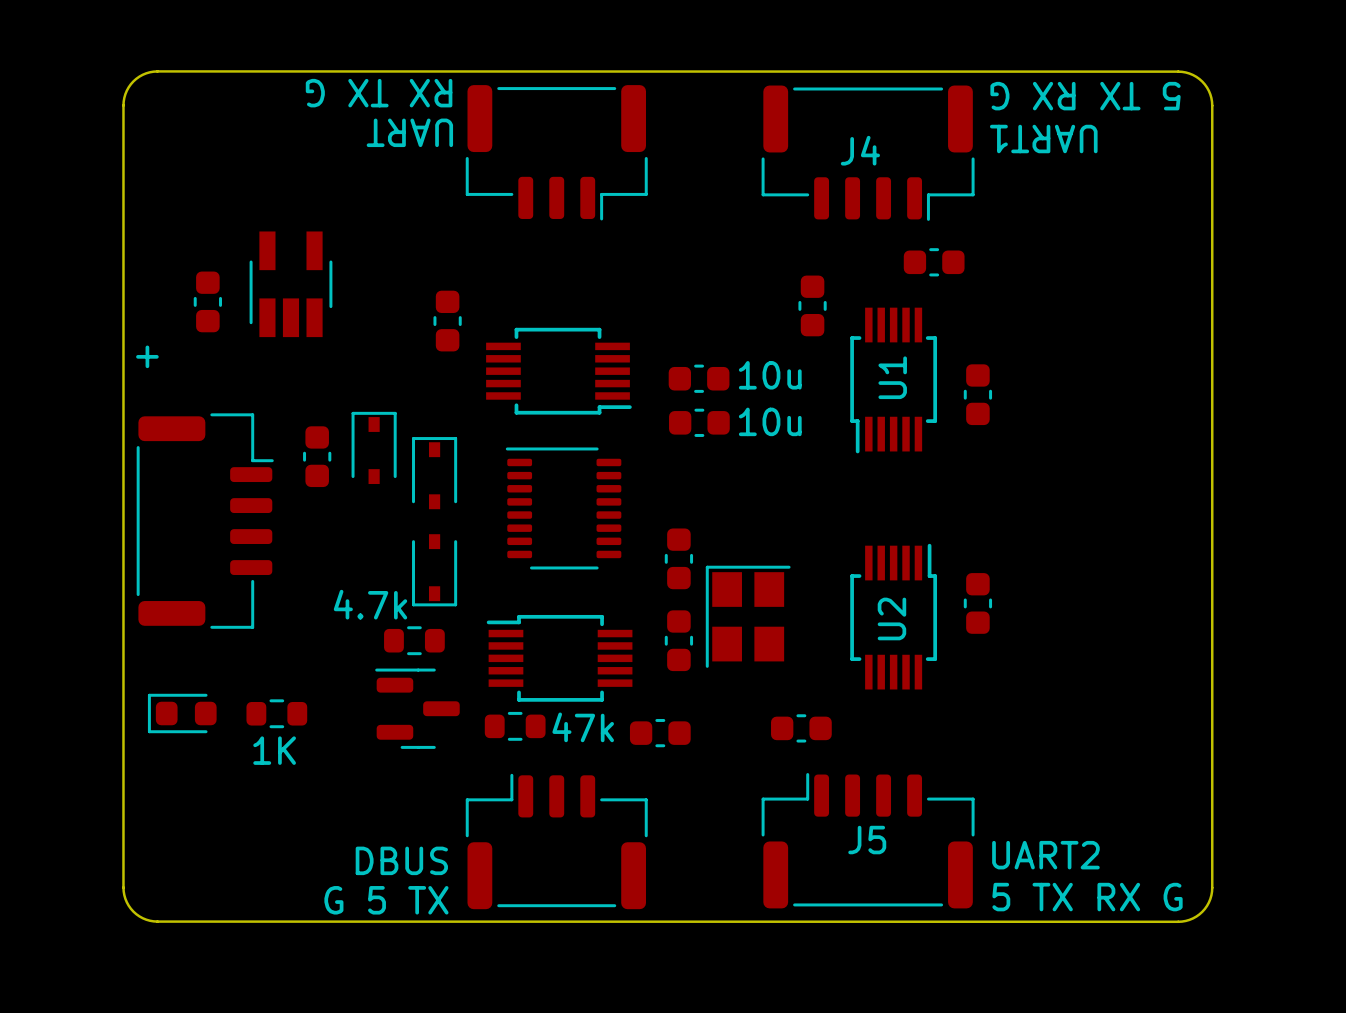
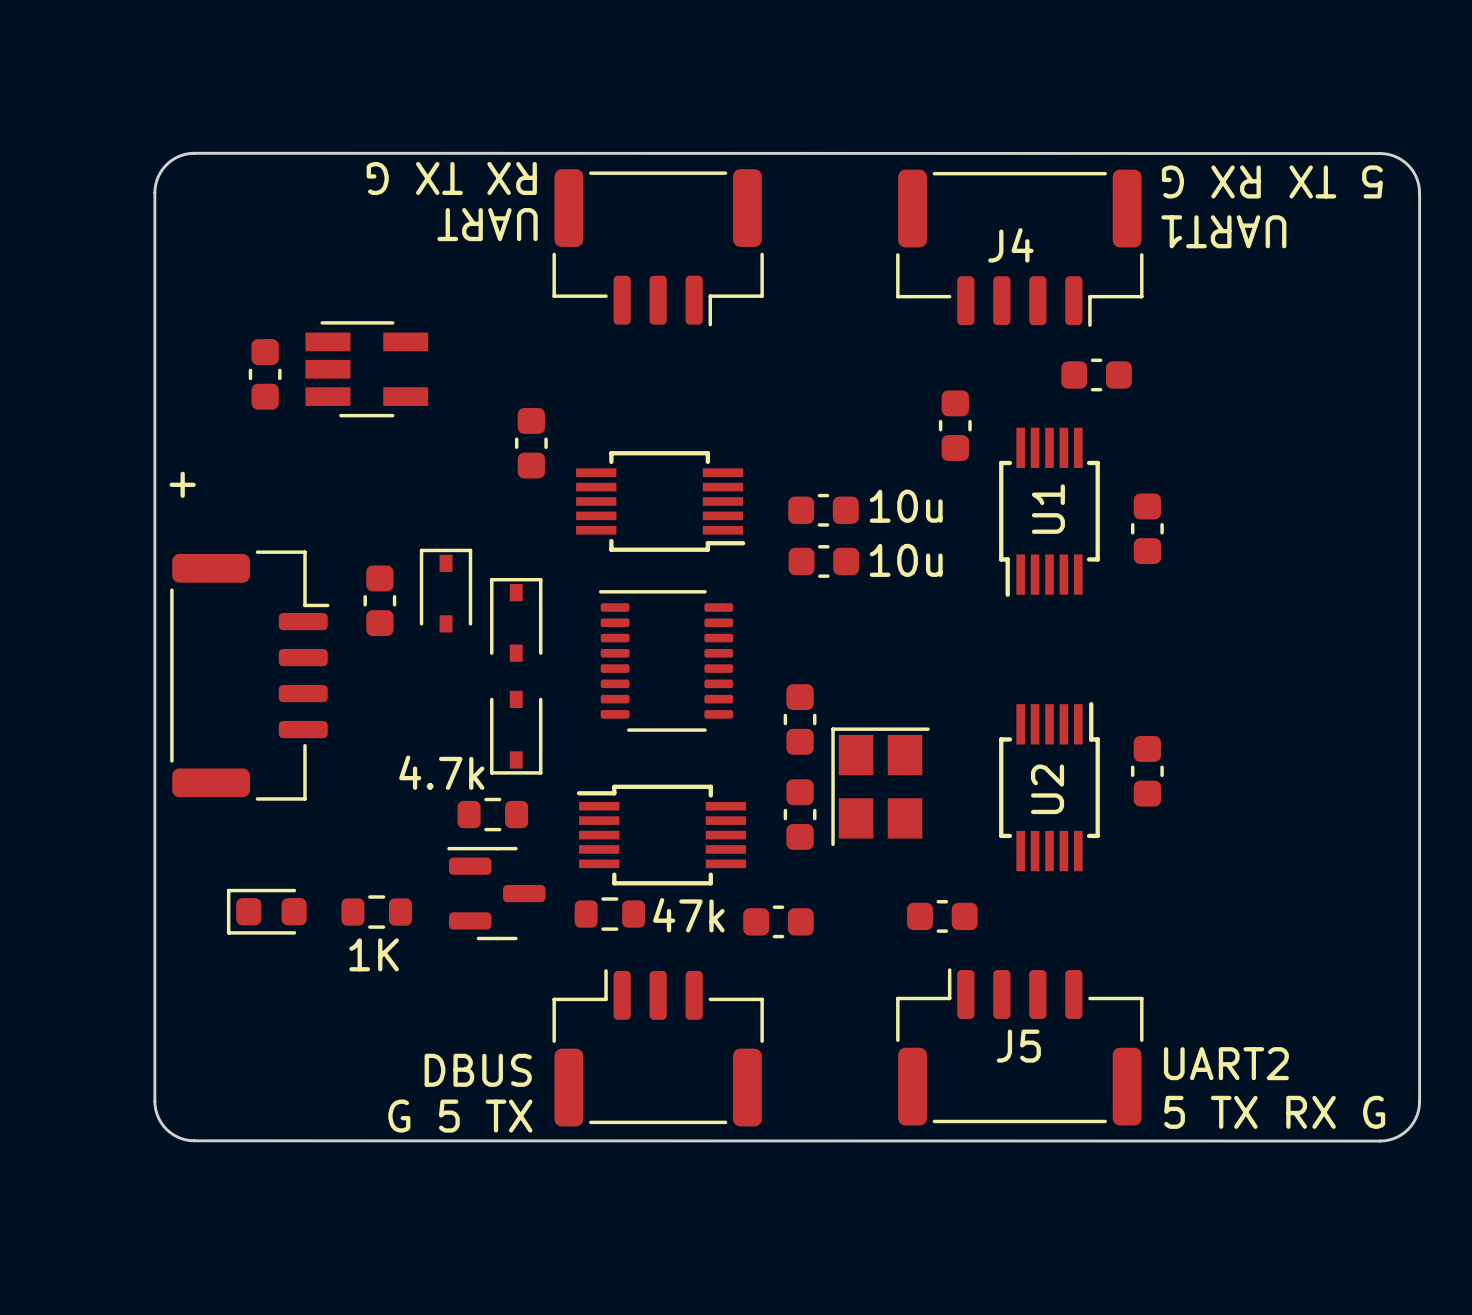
part rotation: 0° (290, 284) -> 90° clockwise (366, 369)
part position: (207, 301) -> (265, 374)
part position: (182, 713) -> (266, 911)
part position: (276, 713) -> (376, 912)
text position: 1K (274, 750) -> 1K (374, 954)

